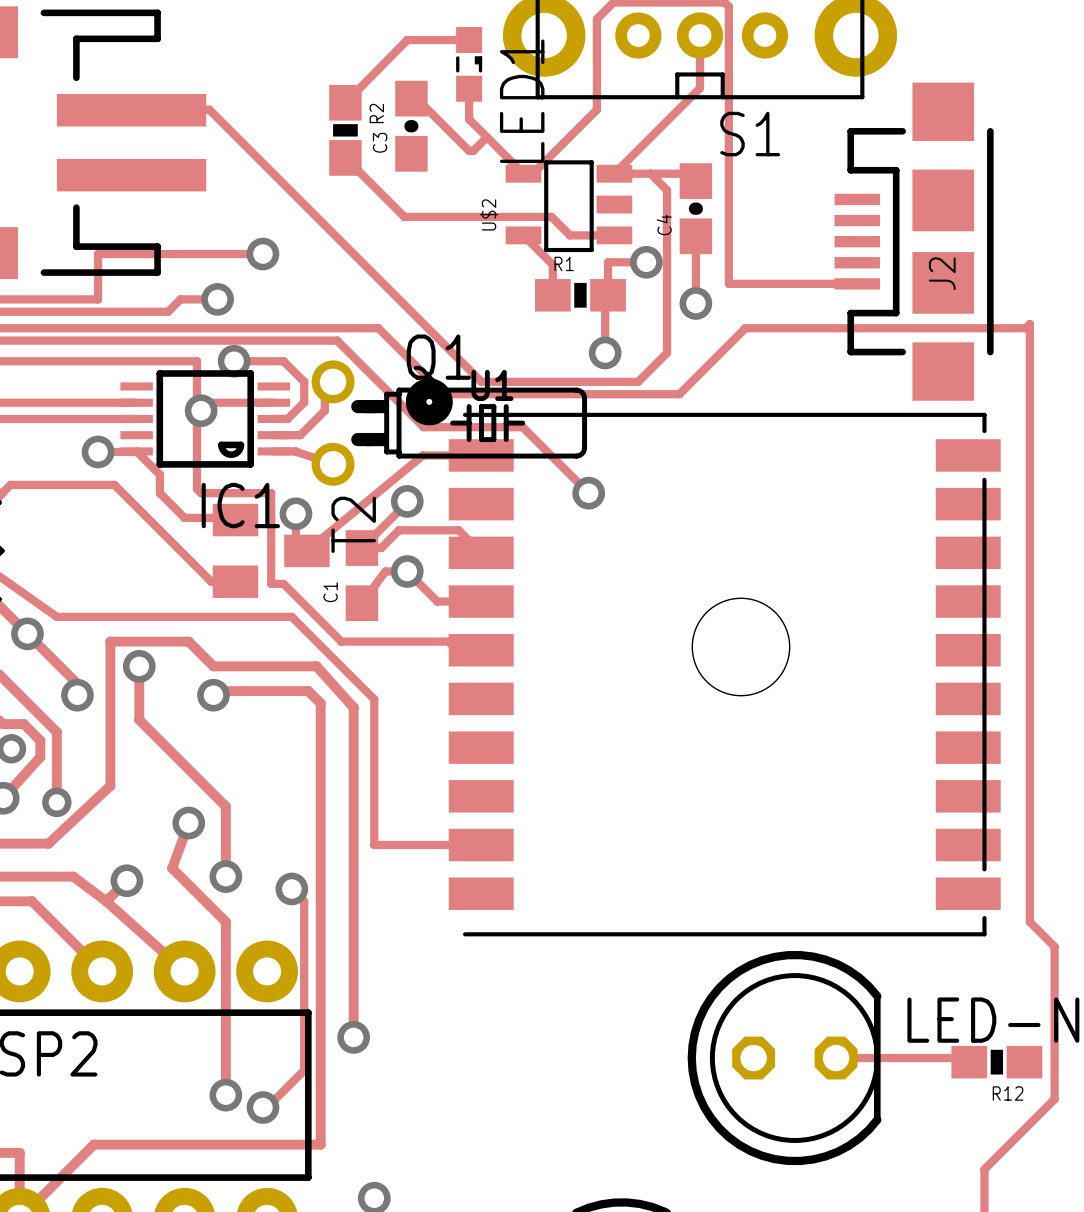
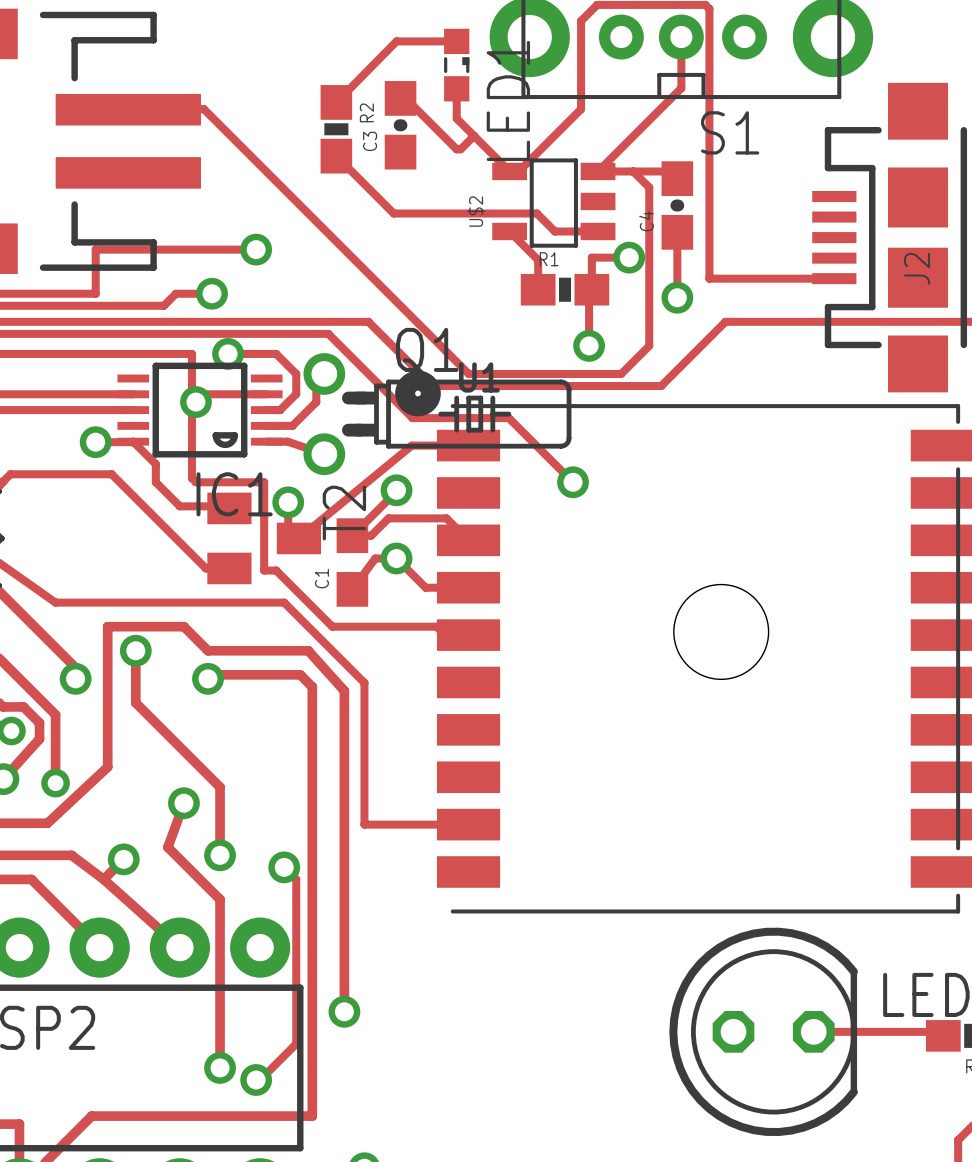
via: (27, 633) -> none

